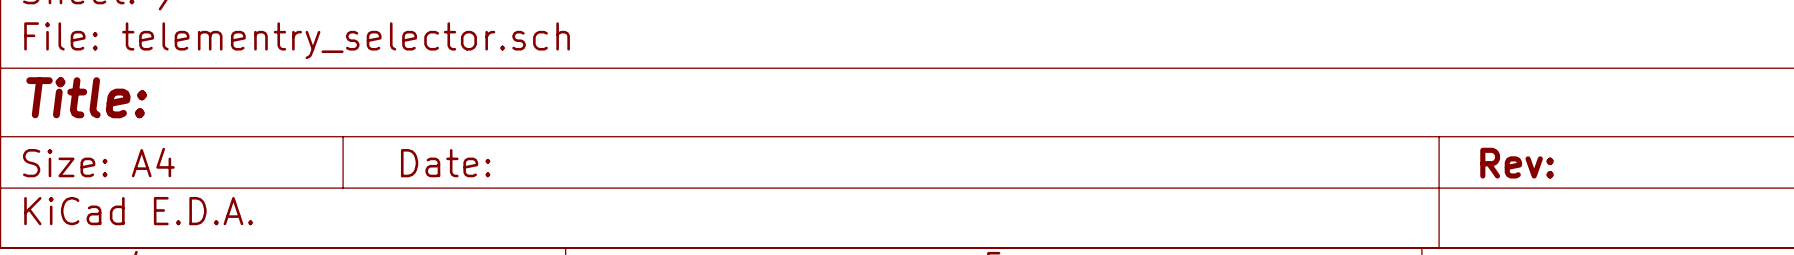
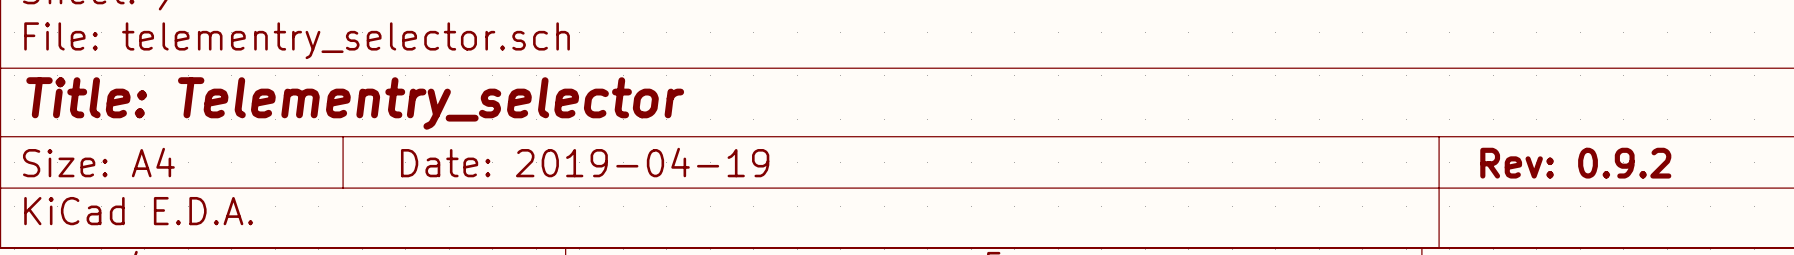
title block: Title: (86, 97) -> Title: Telementry_selector (355, 103)
title block: Date: (445, 163) -> Date: 2019-04-19 (585, 162)
title block: Rev: (1517, 163) -> Rev: 0.9.2 (1575, 163)

